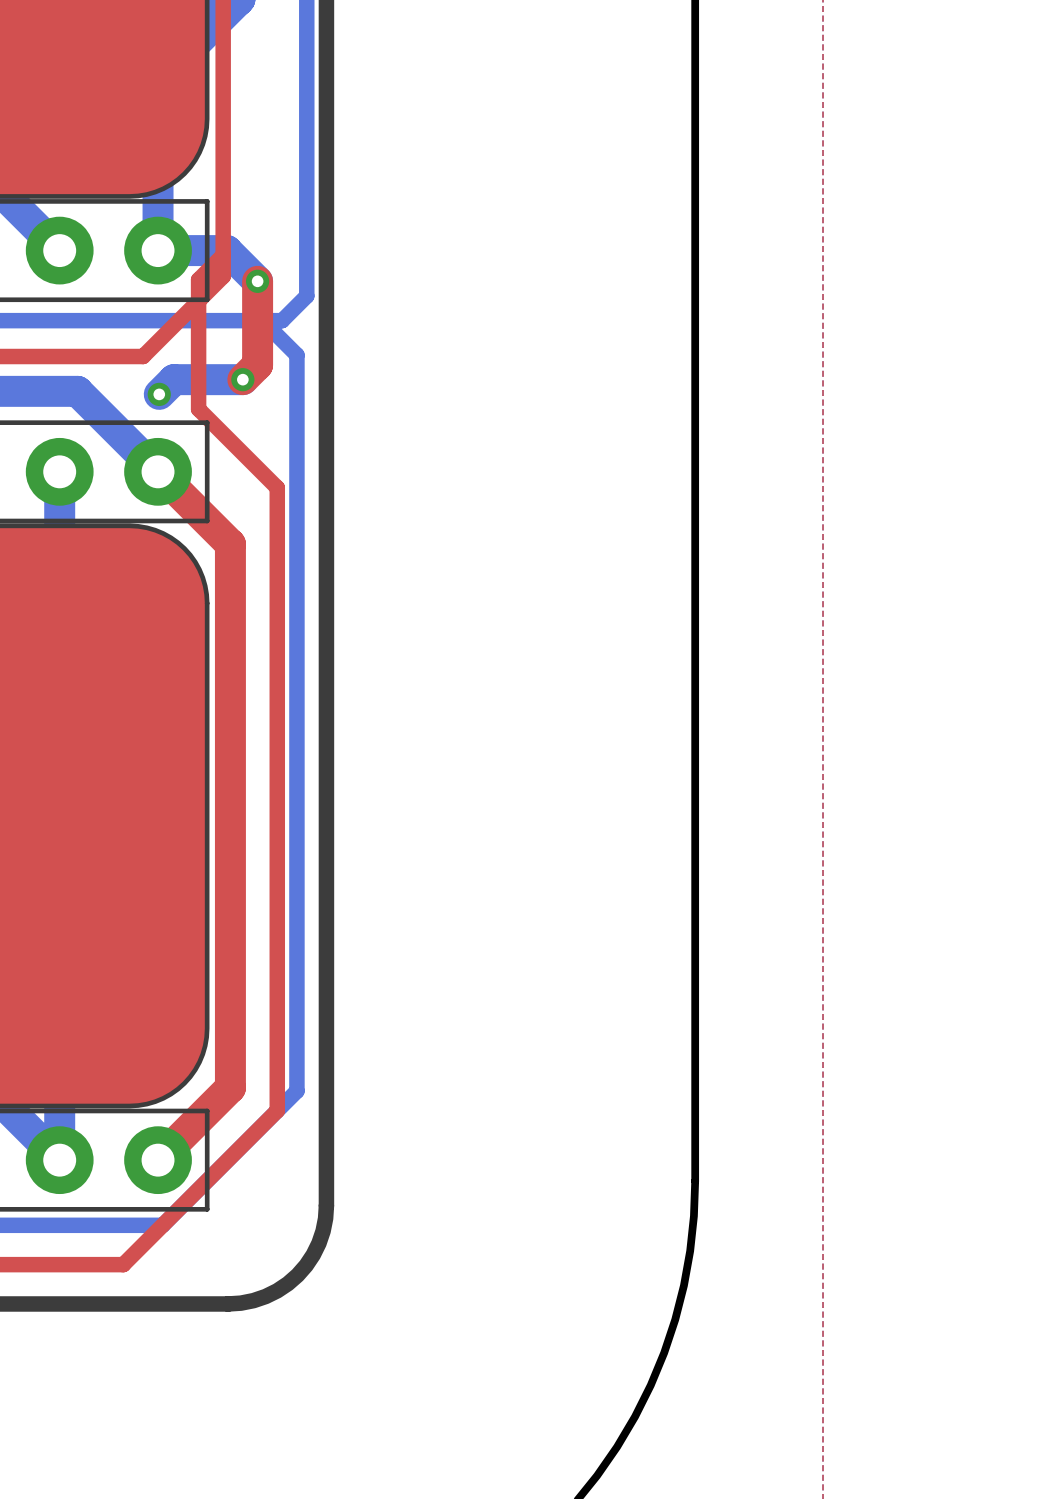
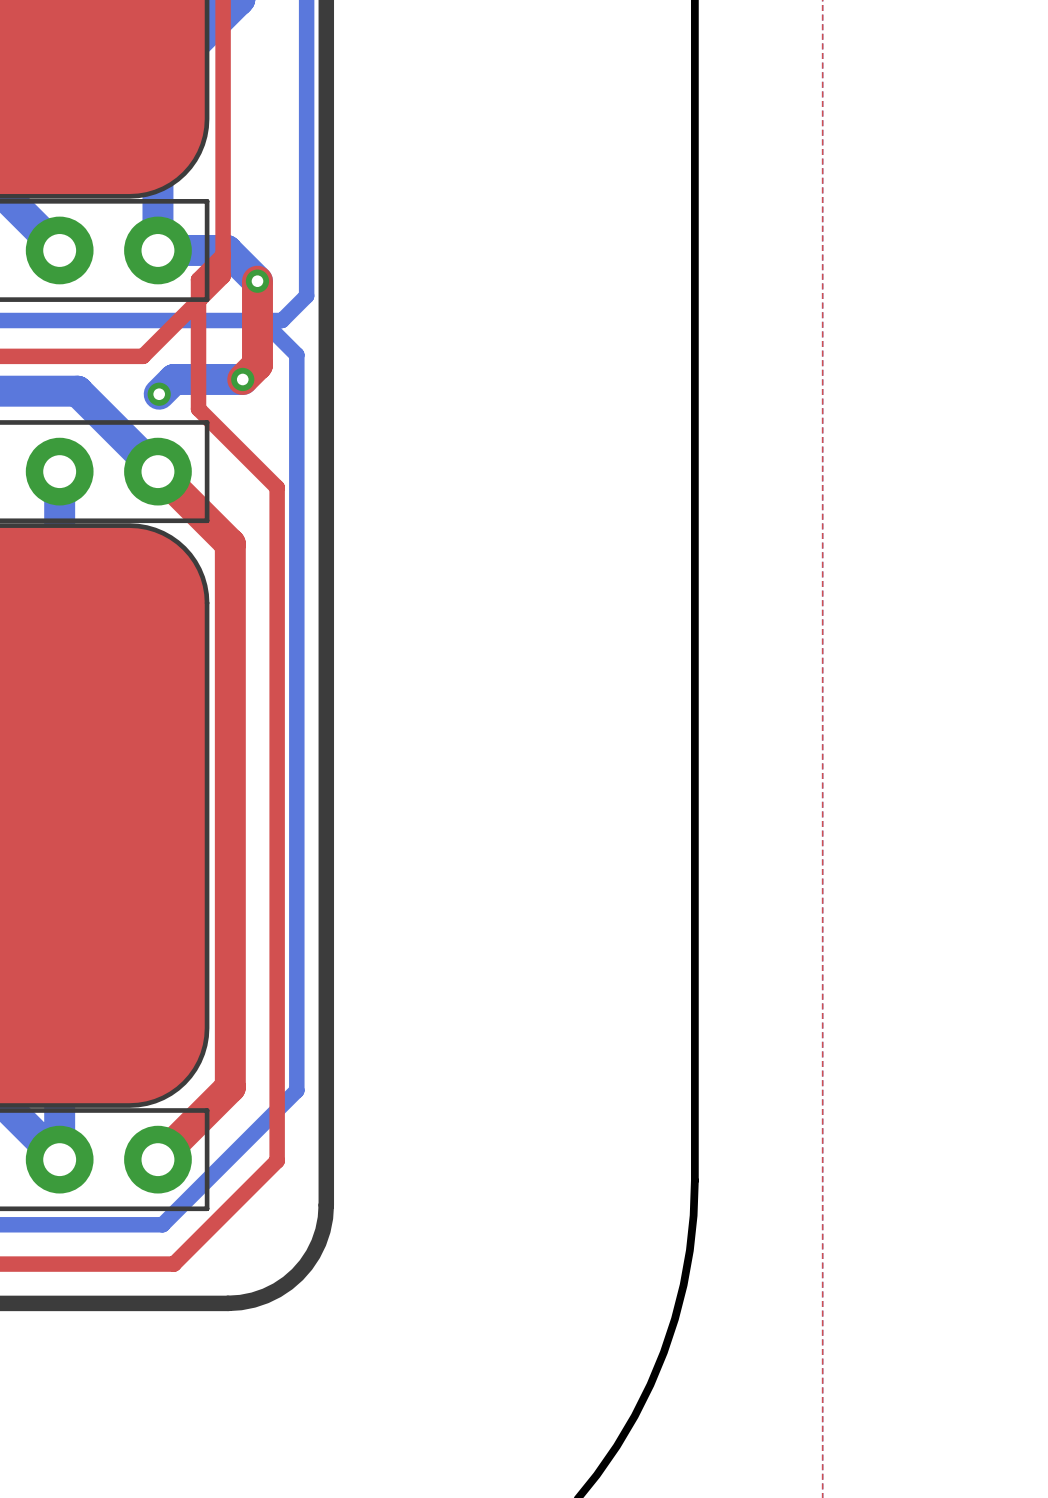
top track: (277, 1110) (123, 1264) -> (277, 1110) (277, 1160) (173, 1264) (123, 1264)

